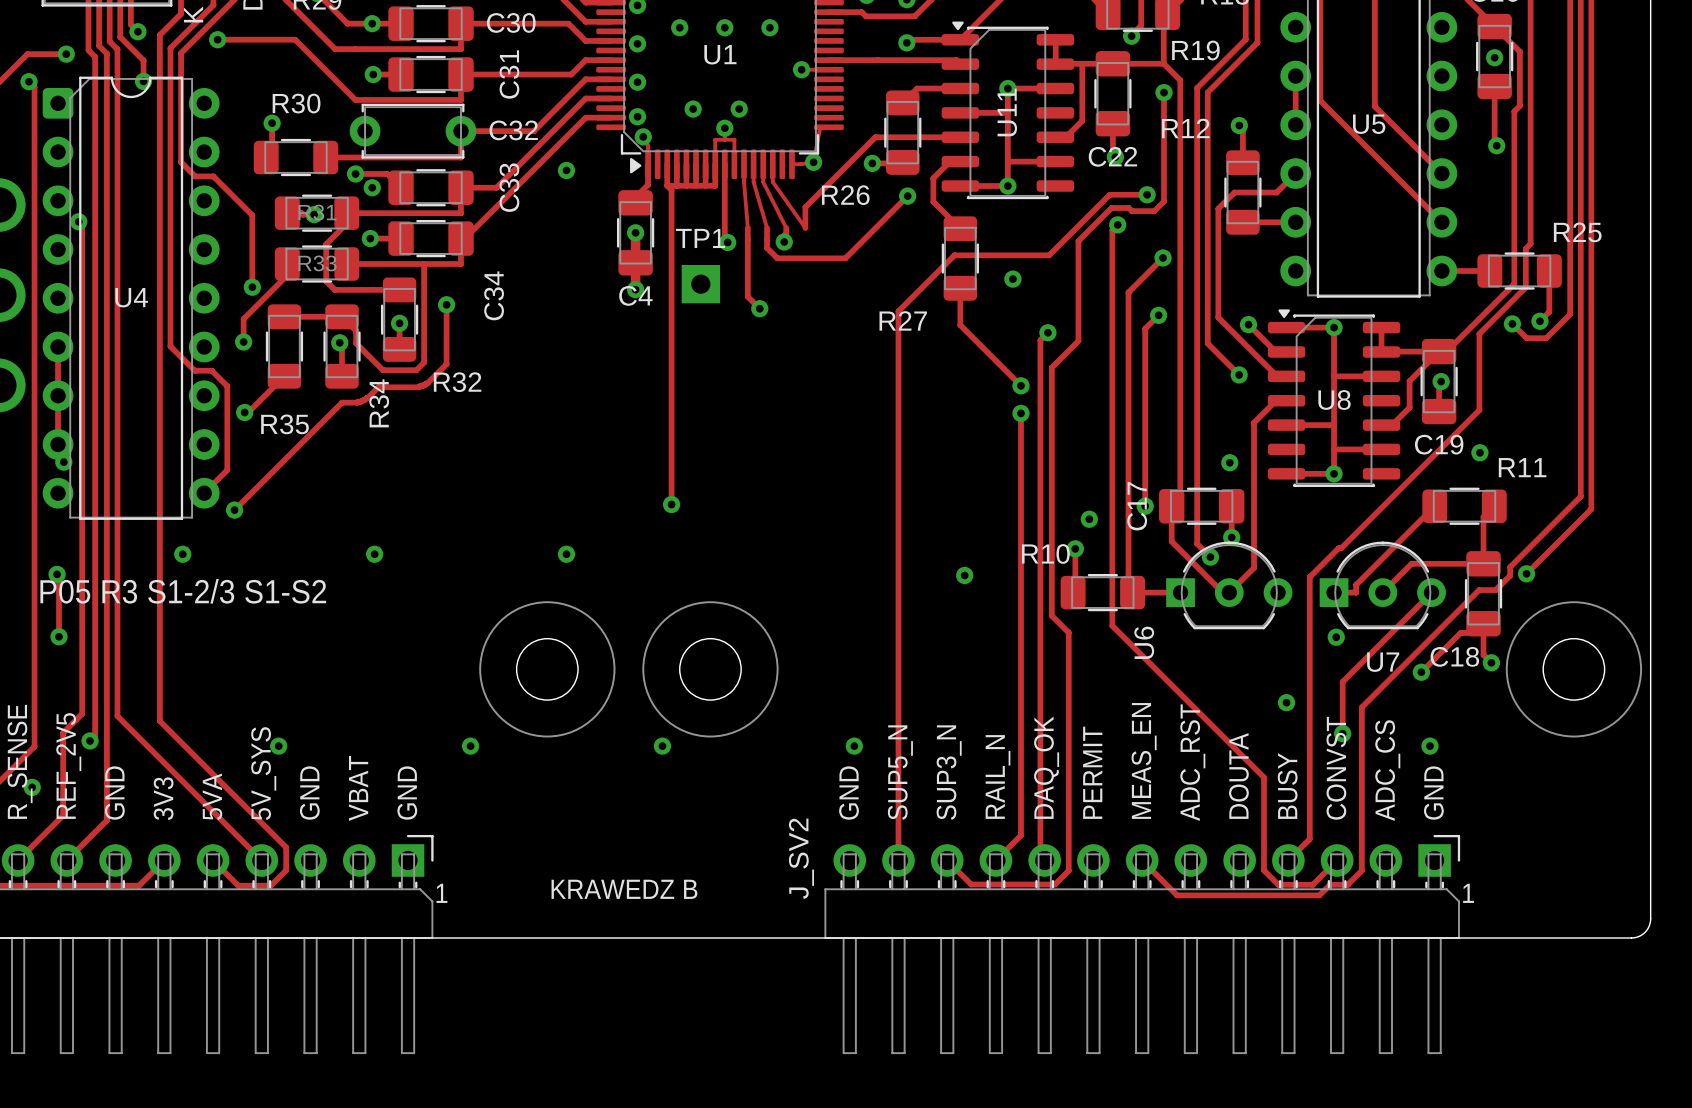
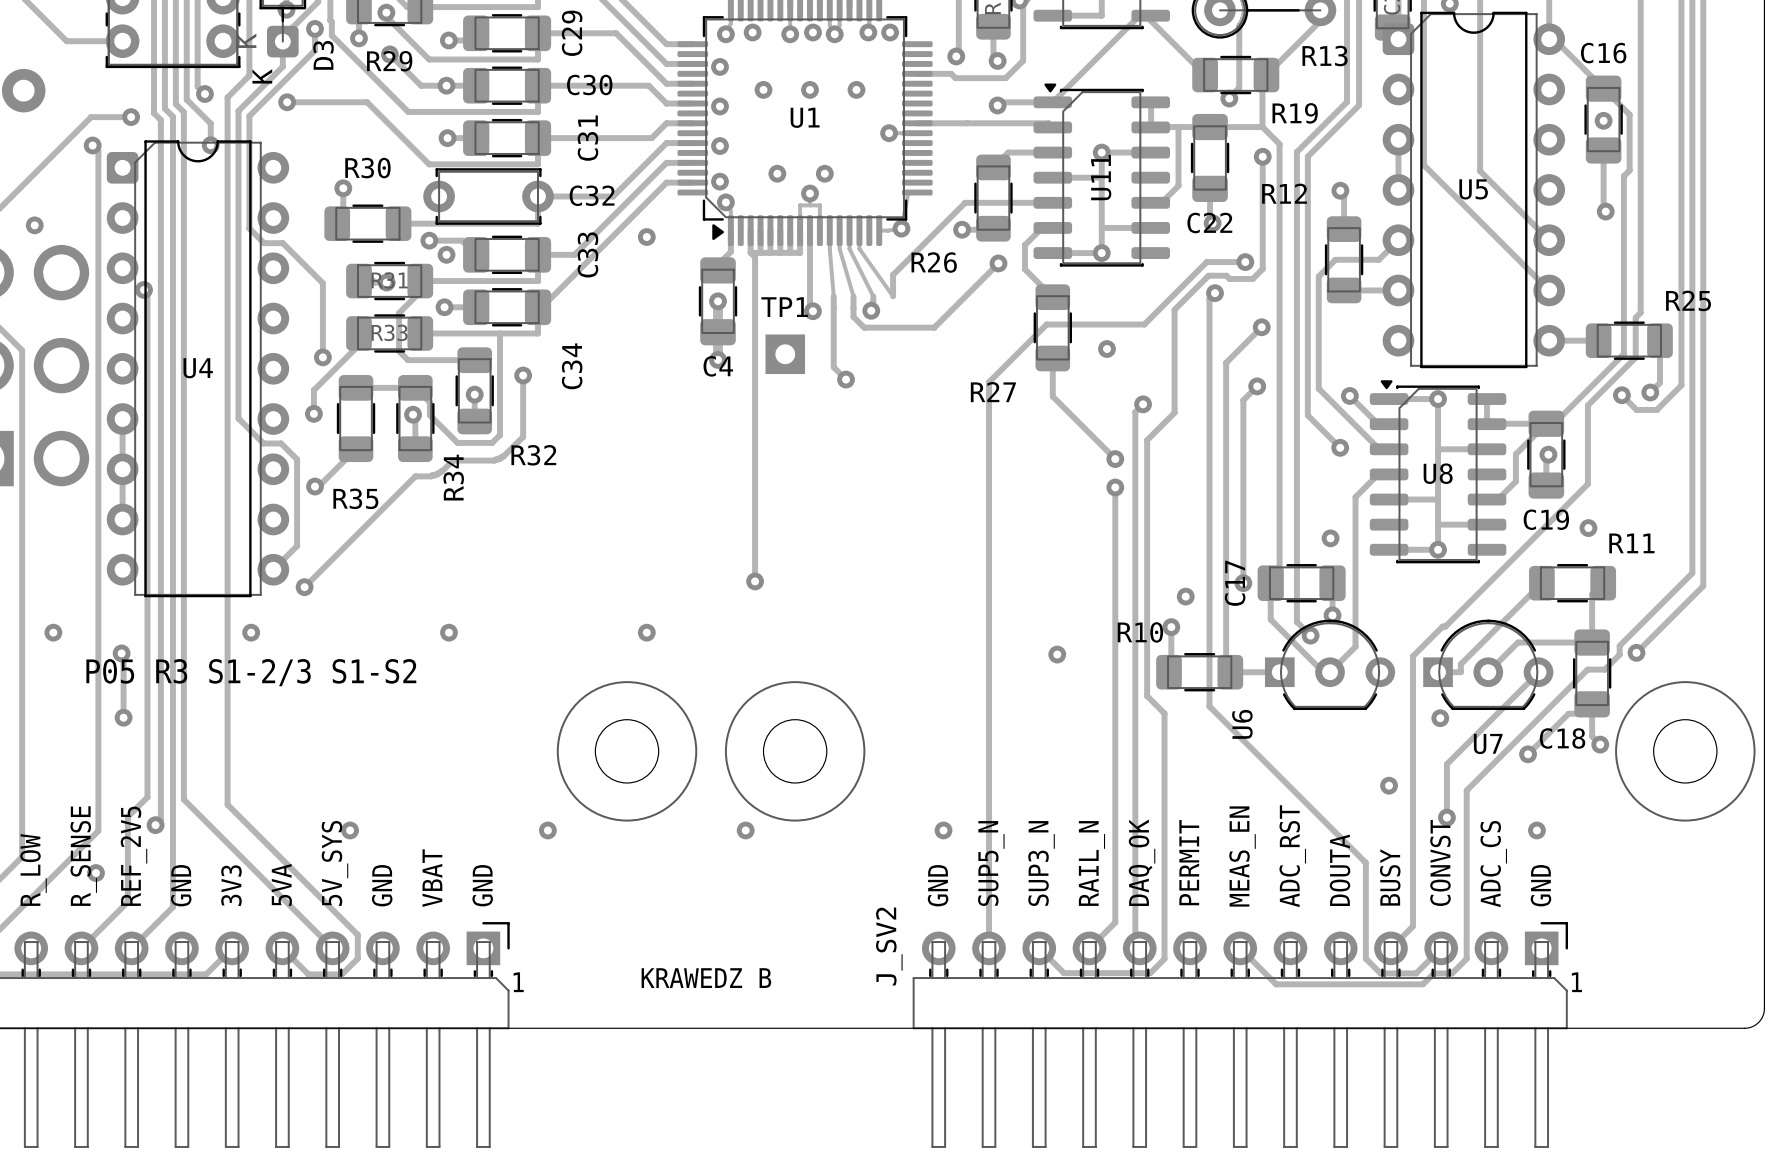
via: (63, 462) -> none

